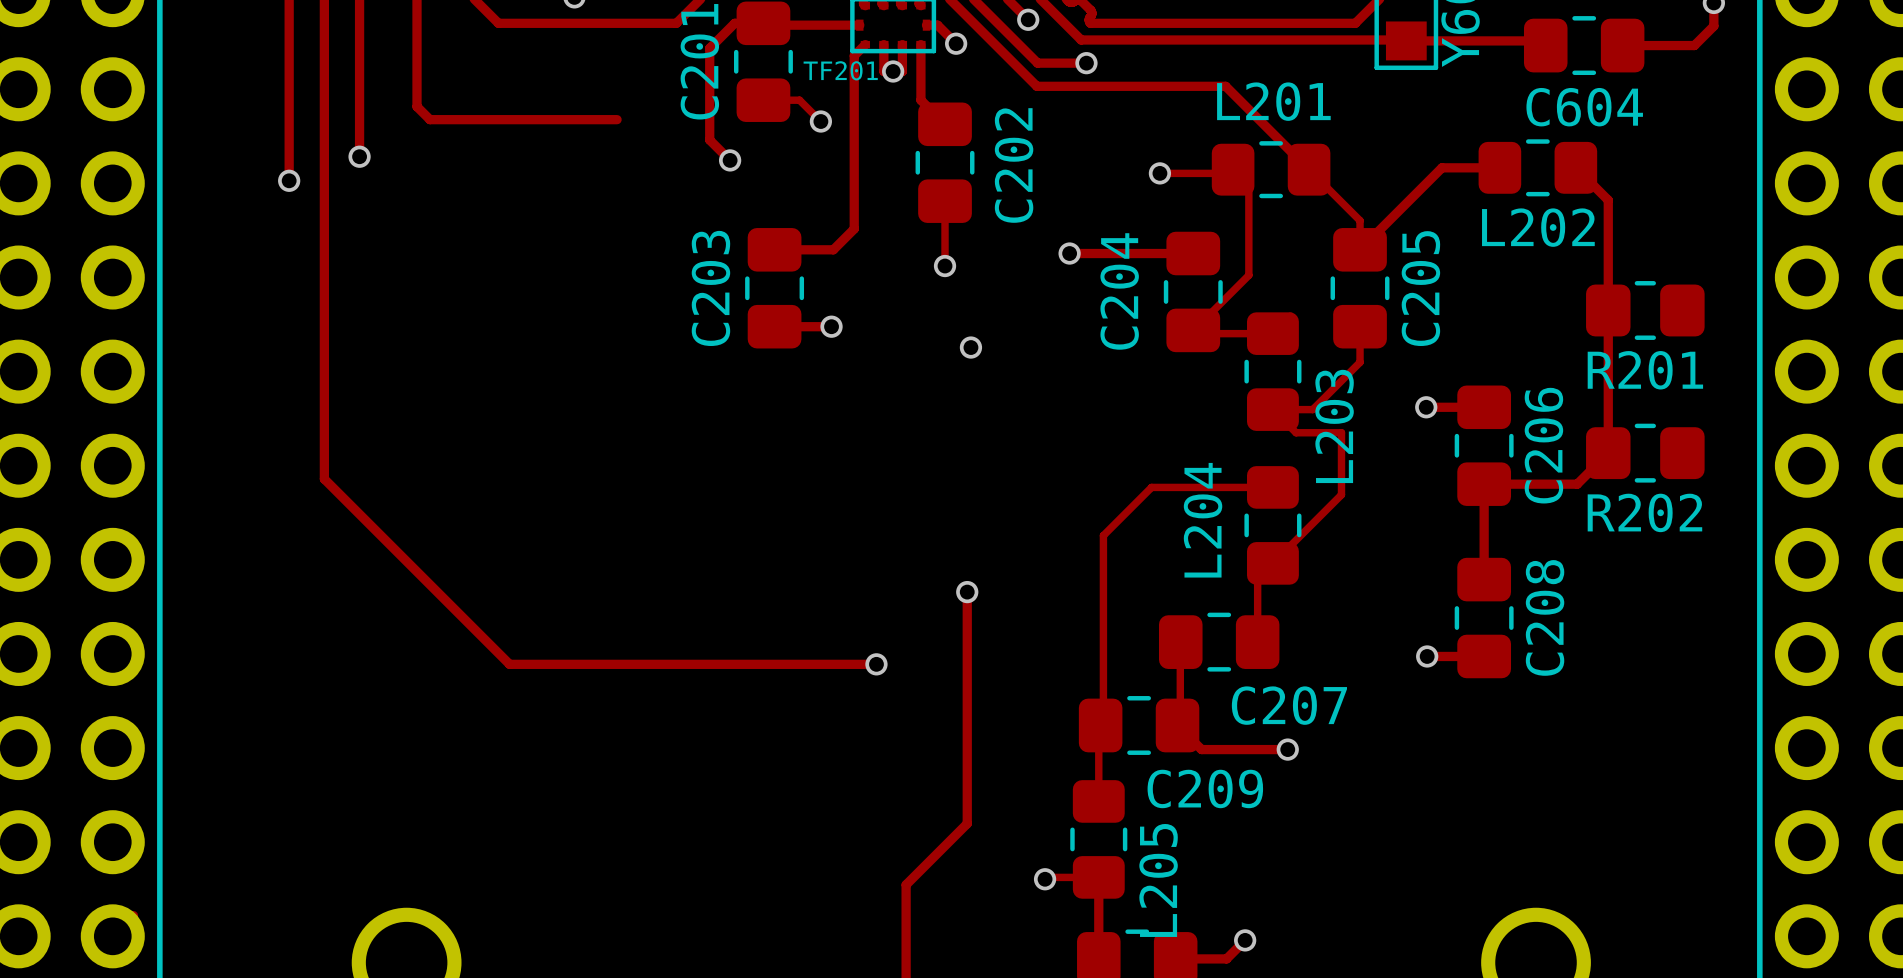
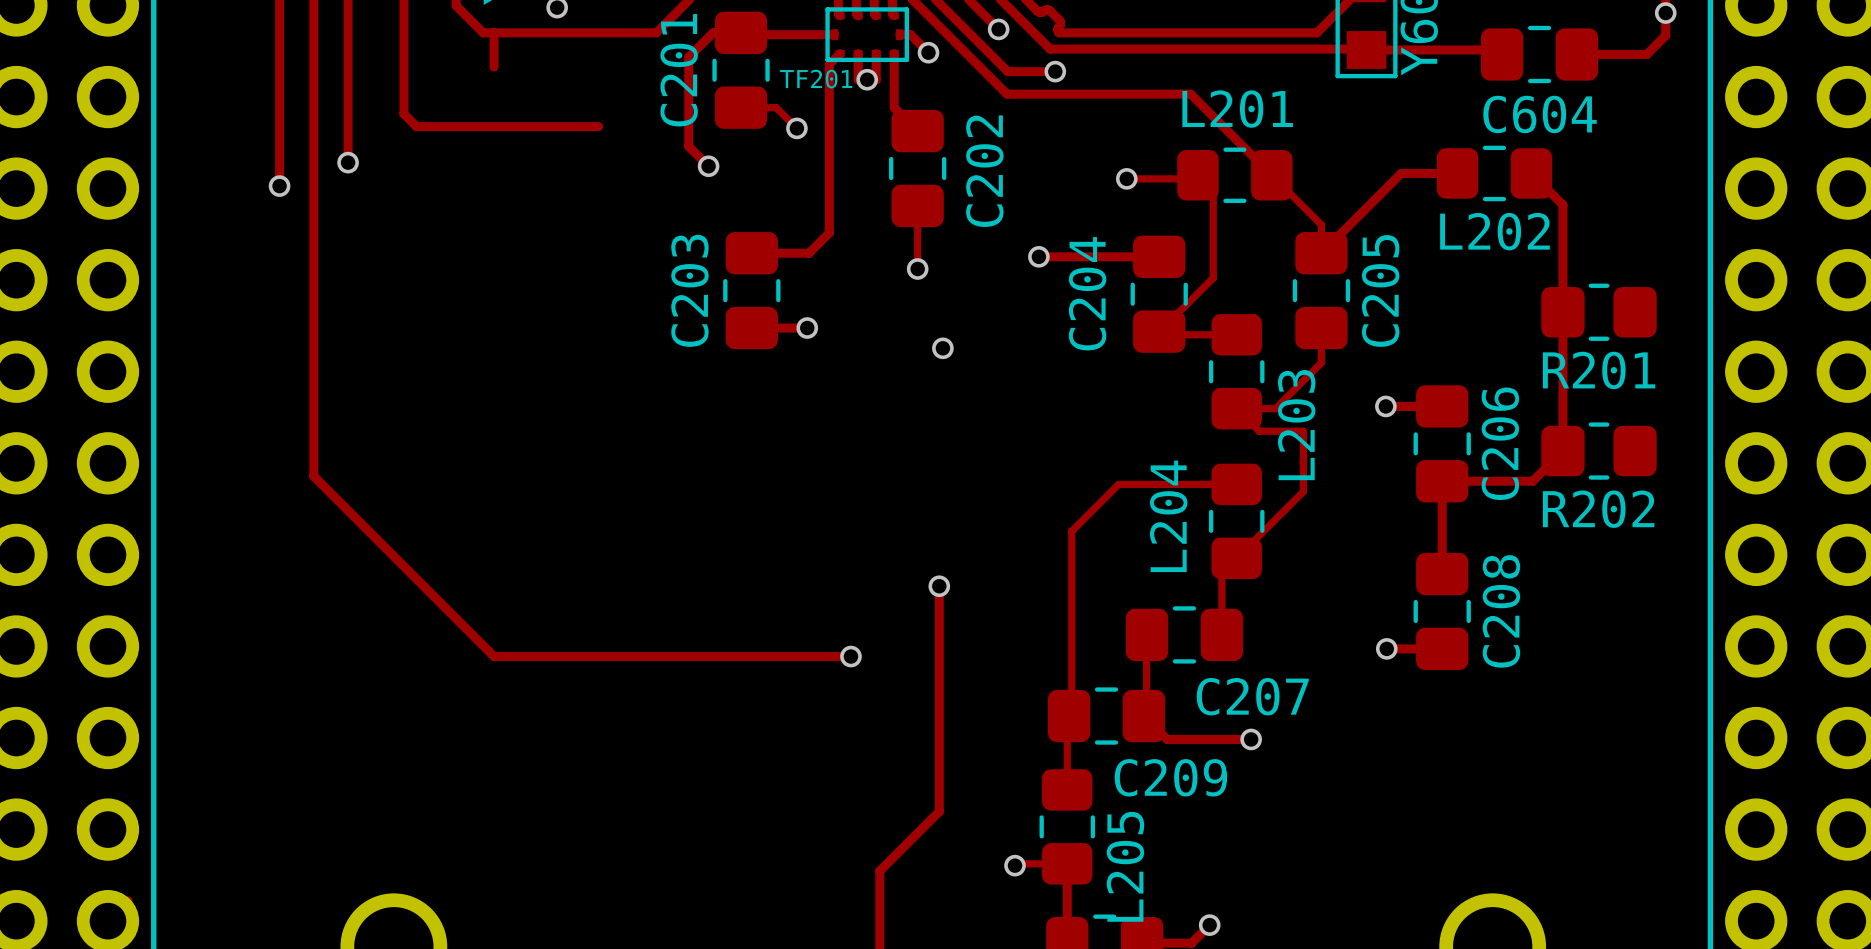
track: none -> (494, 32) (494, 67)

